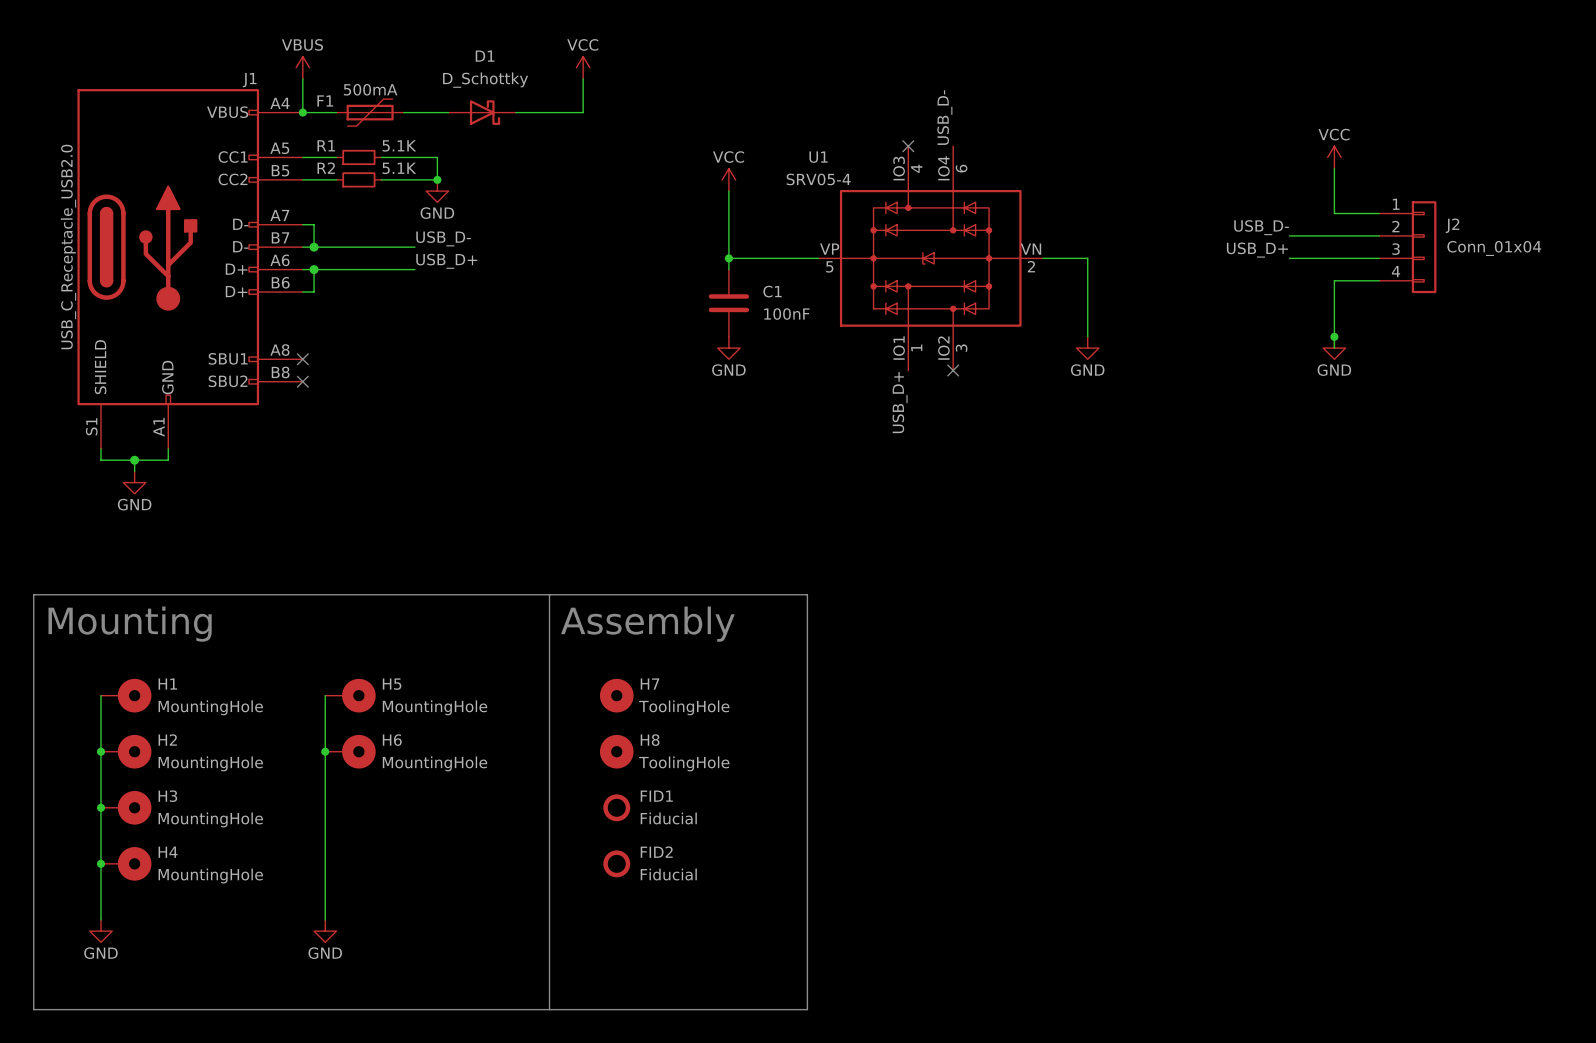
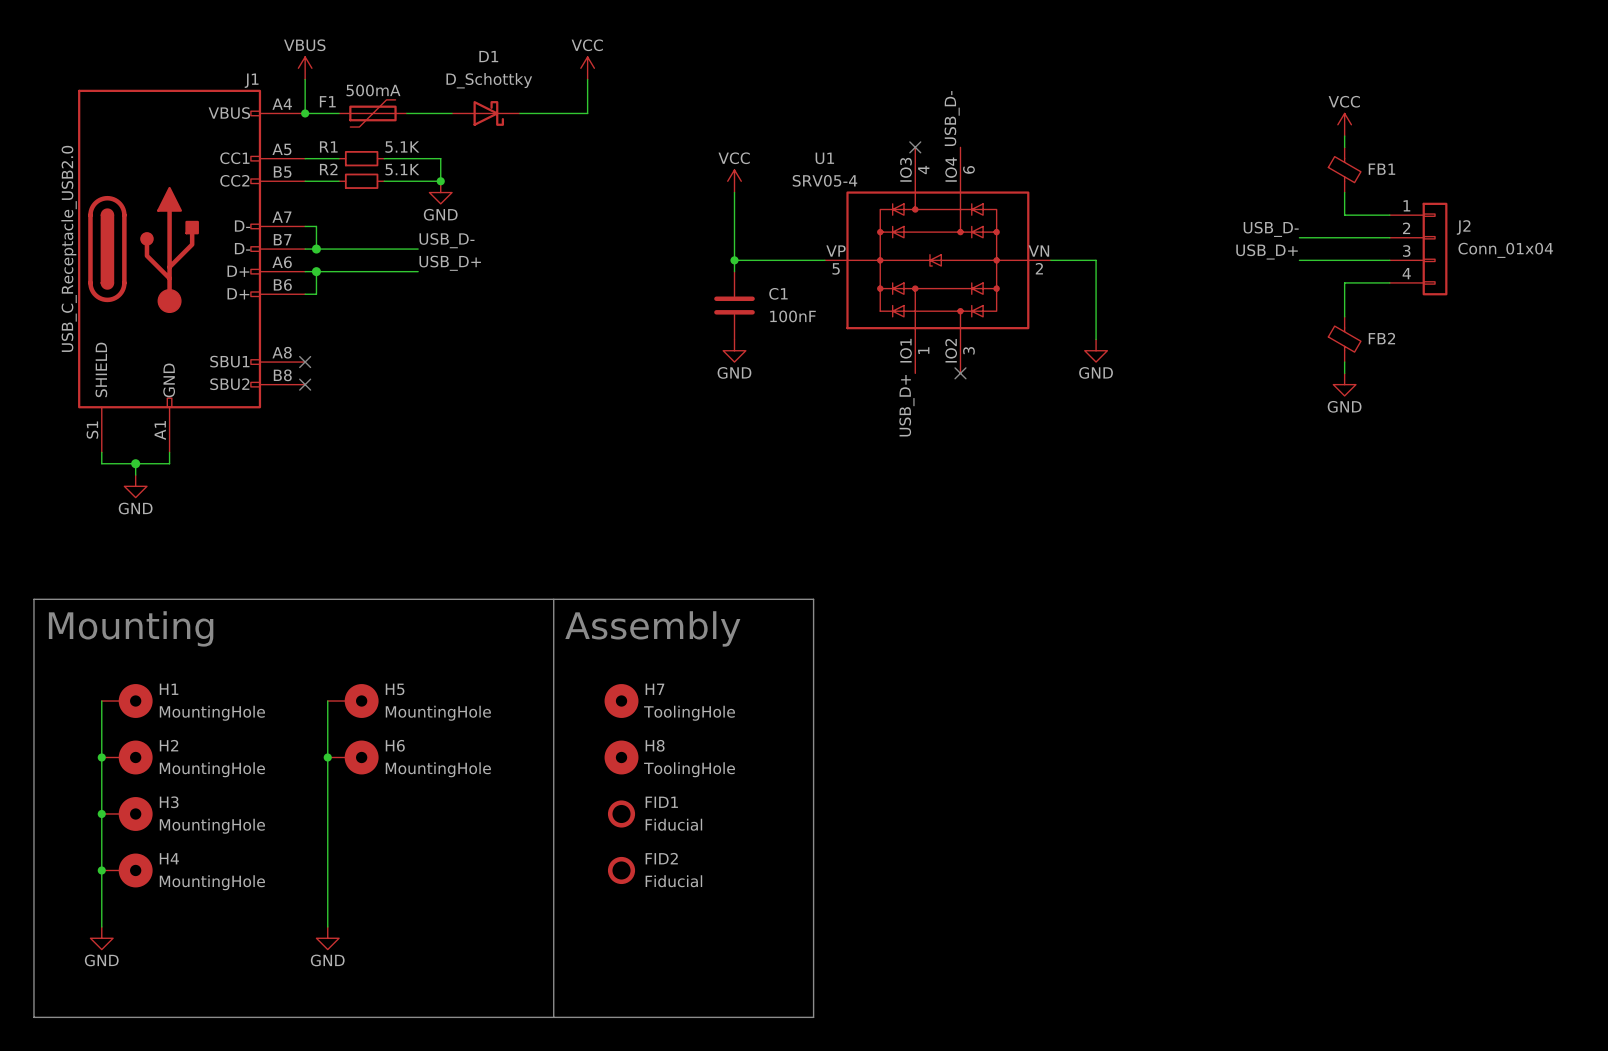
wire: none -> (1344, 136) (1344, 147)
power symbol position: VCC (1334, 157) -> VCC (1344, 124)
FB1: none -> (1344, 169)
junction: (1334, 336) -> none
FB2: none -> (1344, 339)
power symbol position: GND (1334, 348) -> GND (1344, 384)
wire: none -> (1344, 362) (1344, 373)

